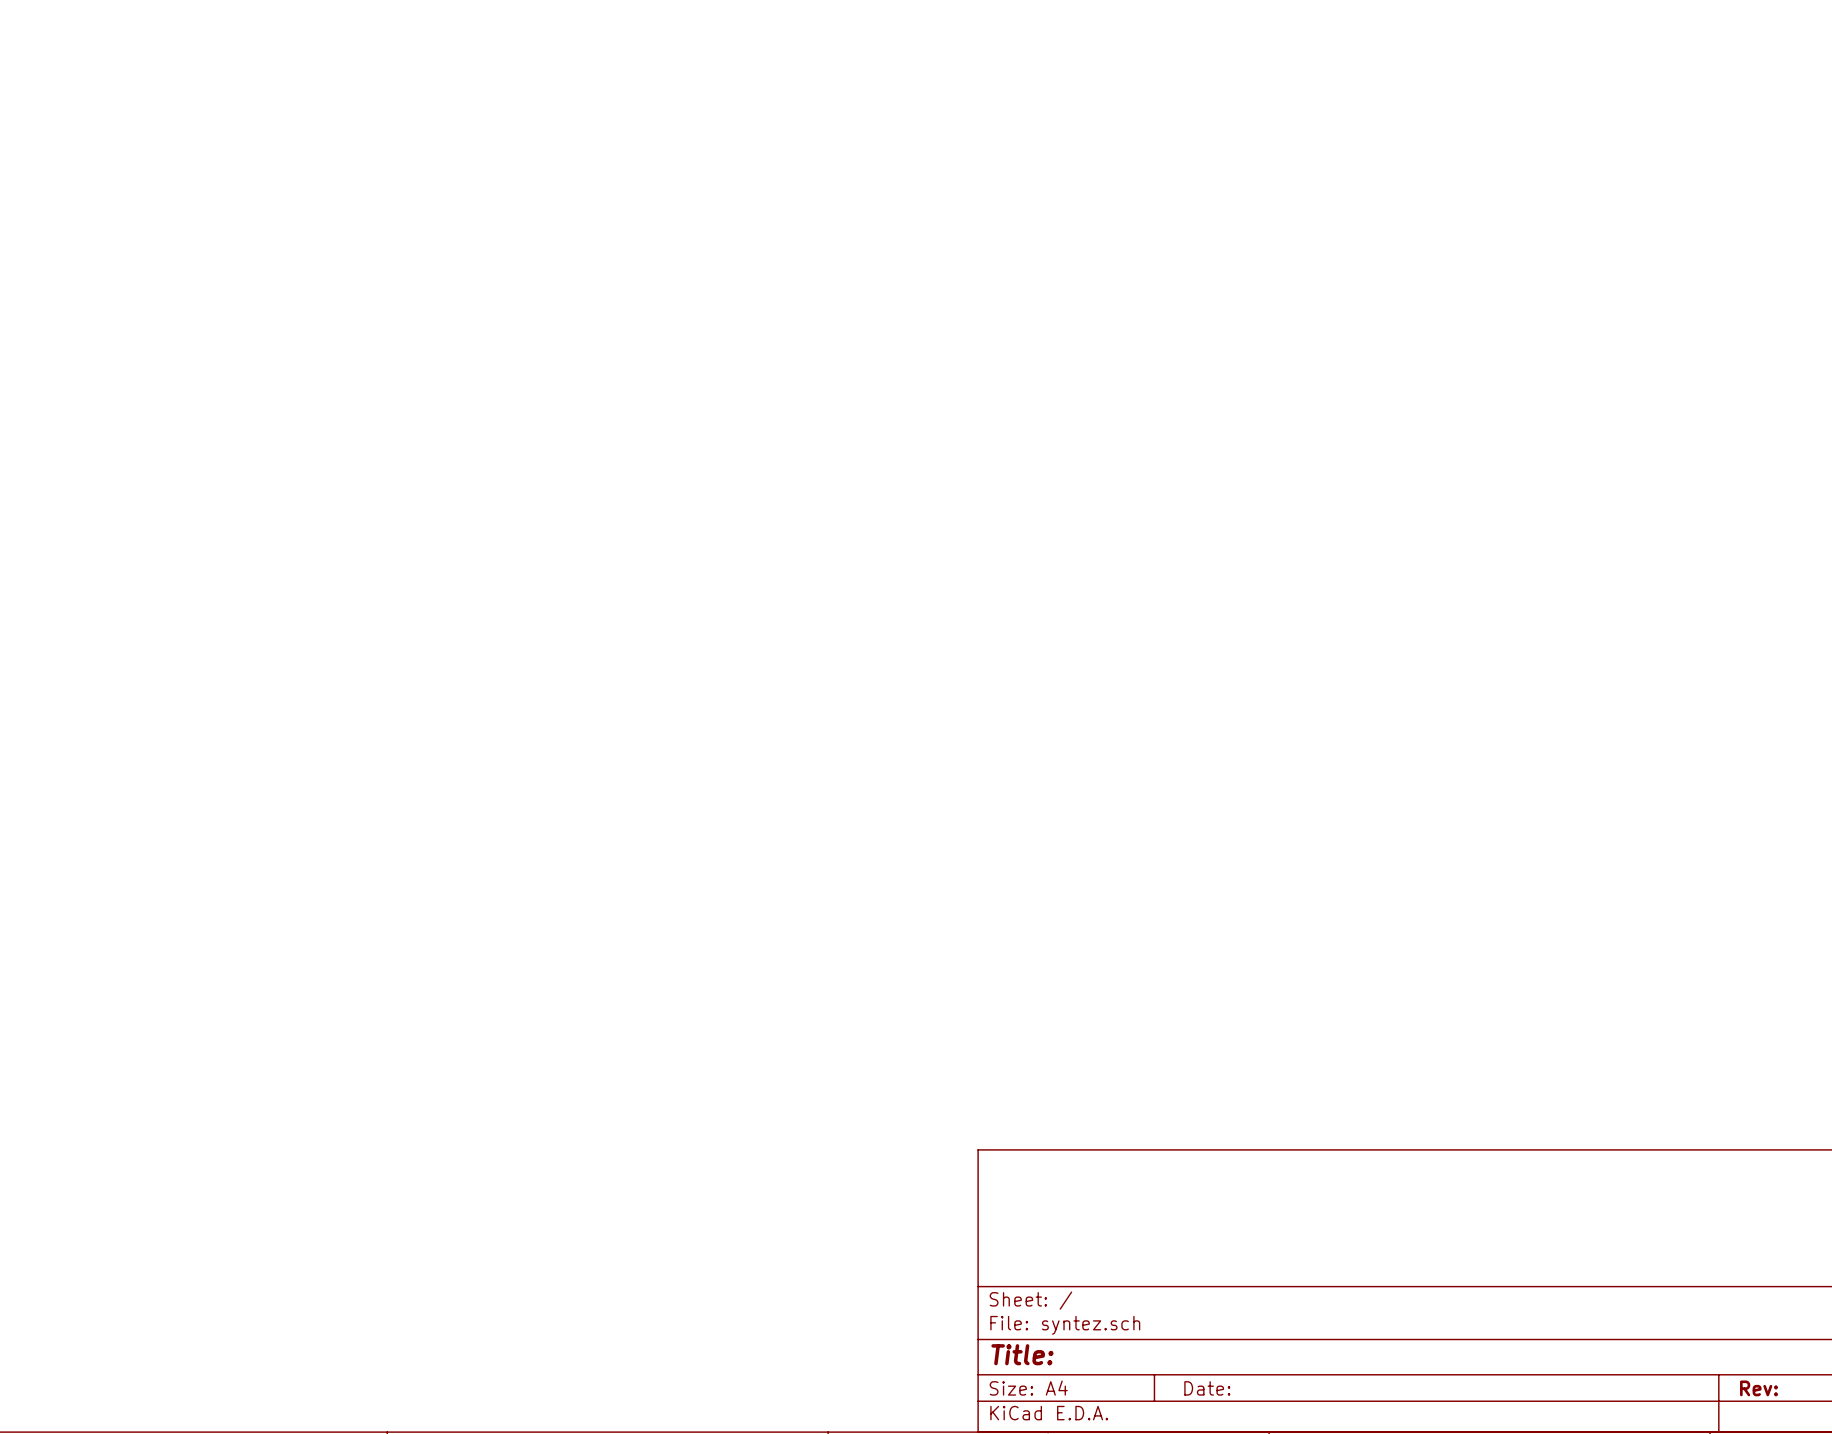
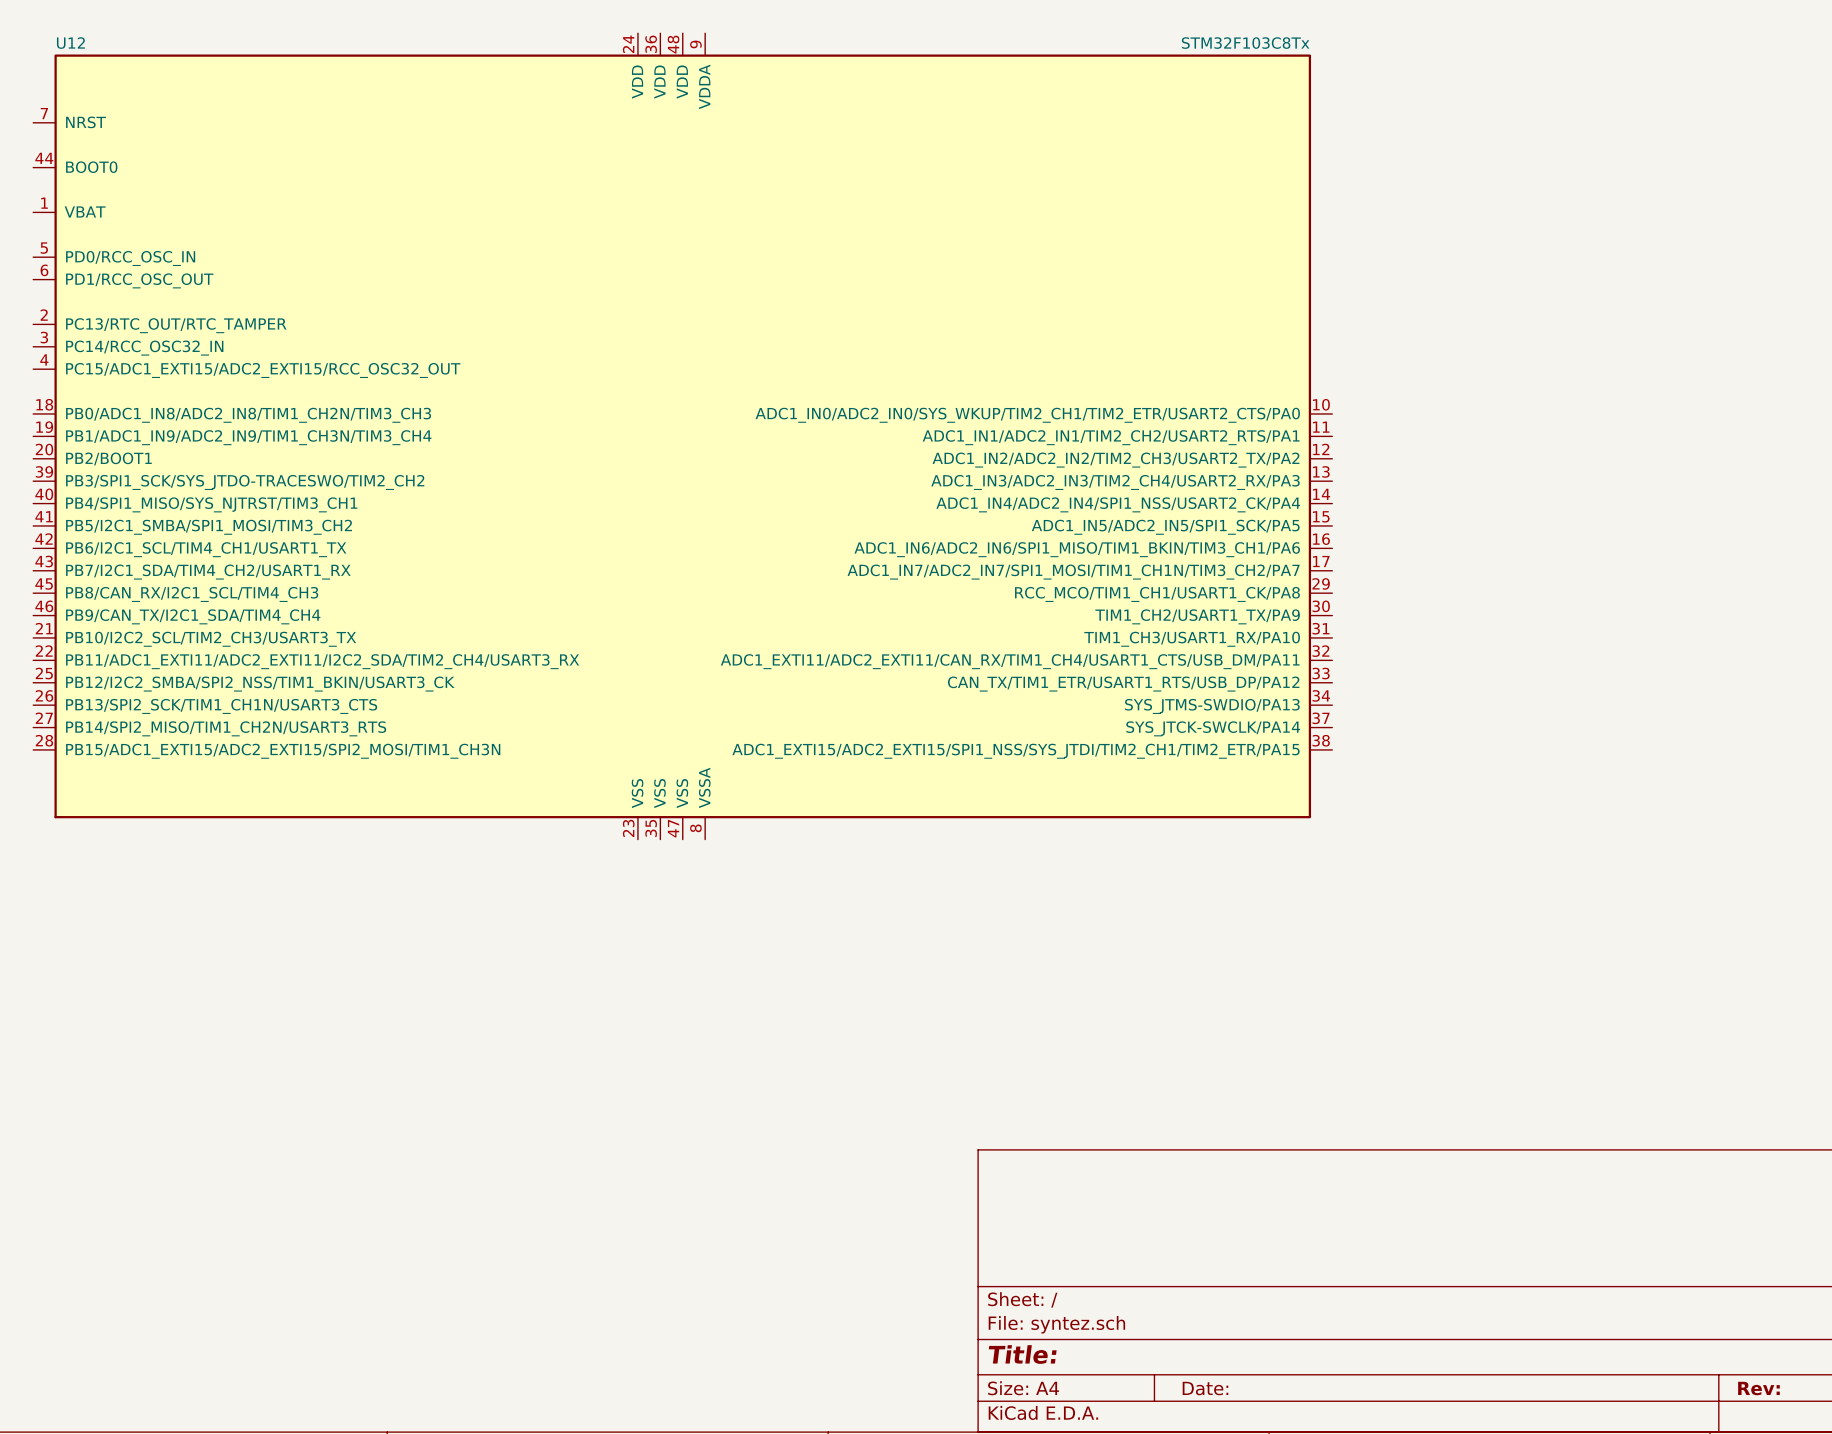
U12: none -> STM32F103C8Tx (682, 436)

